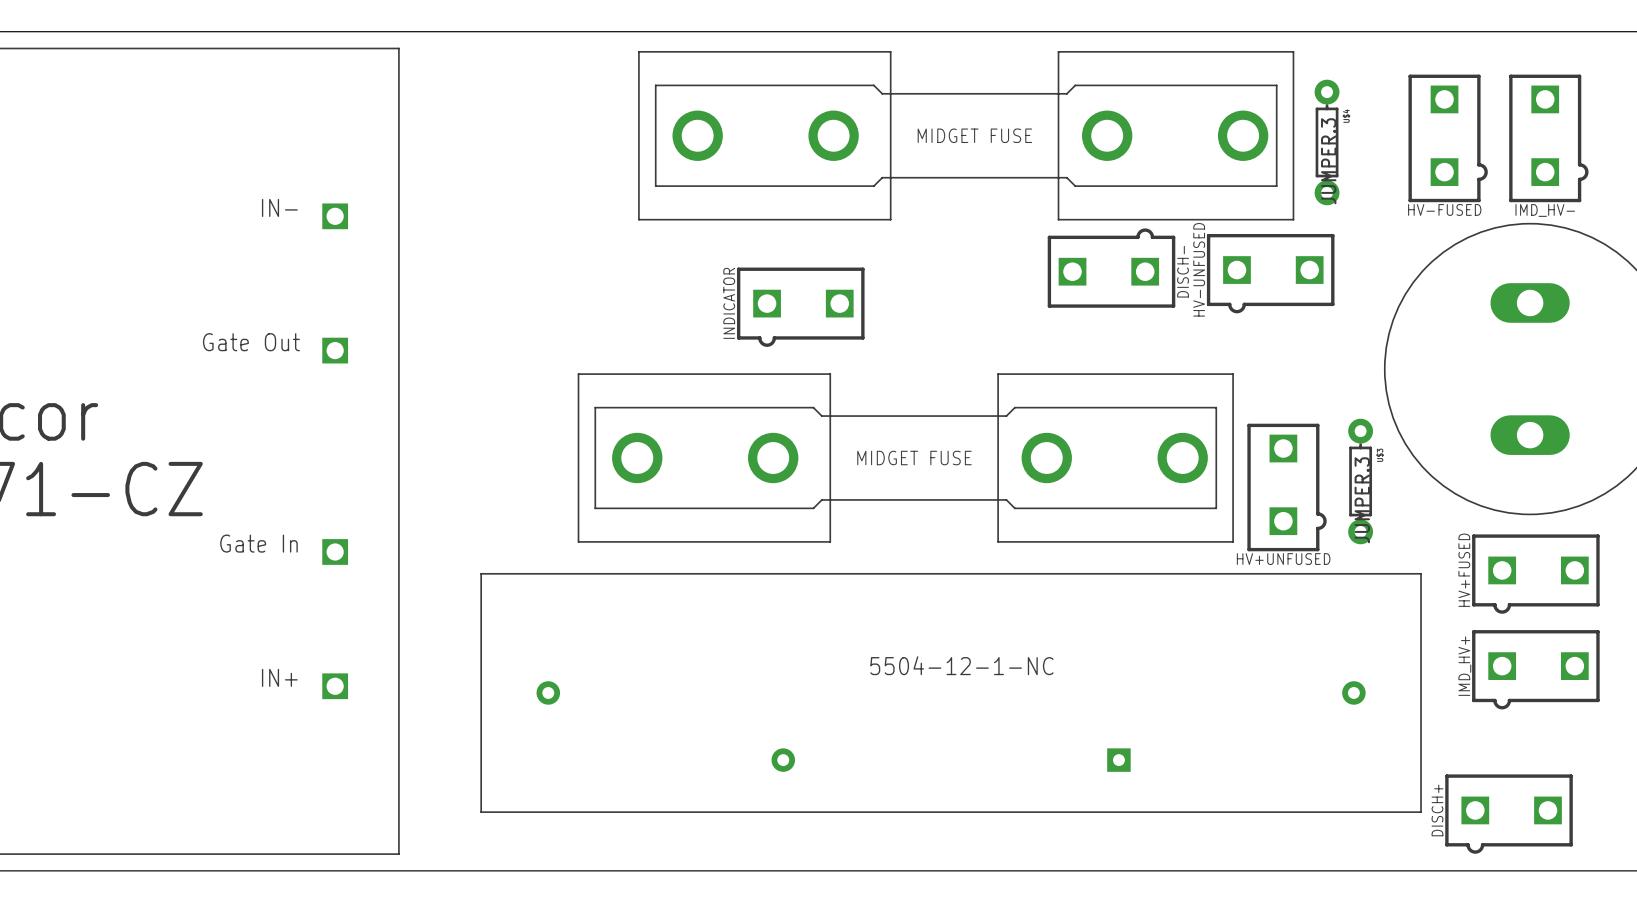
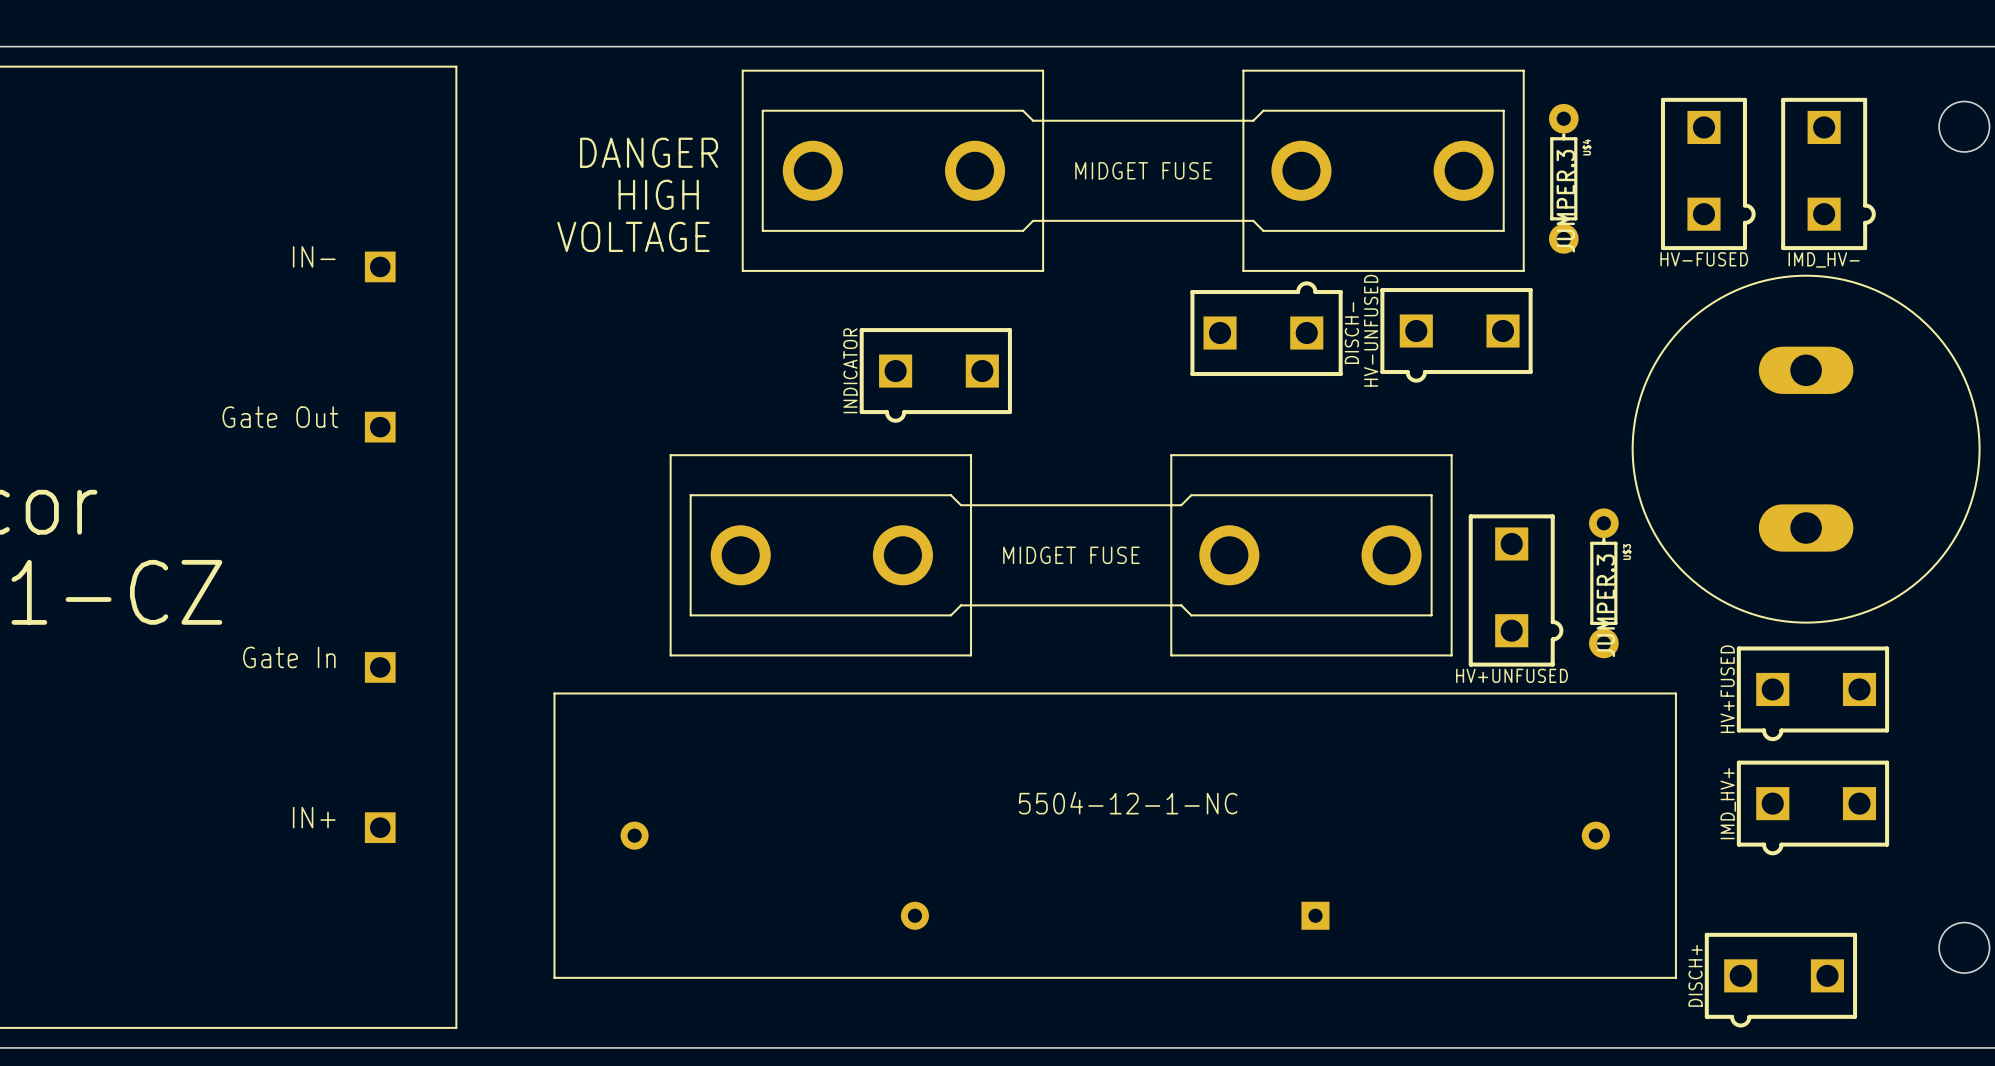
text: none -> DANGER (649, 152)
text: none -> HIGH (658, 194)
text: none -> VOLTAGE (633, 236)
DISCH- position: (1111, 268) -> (1266, 328)
HV-UNFUSED position: (1270, 273) -> (1456, 335)

